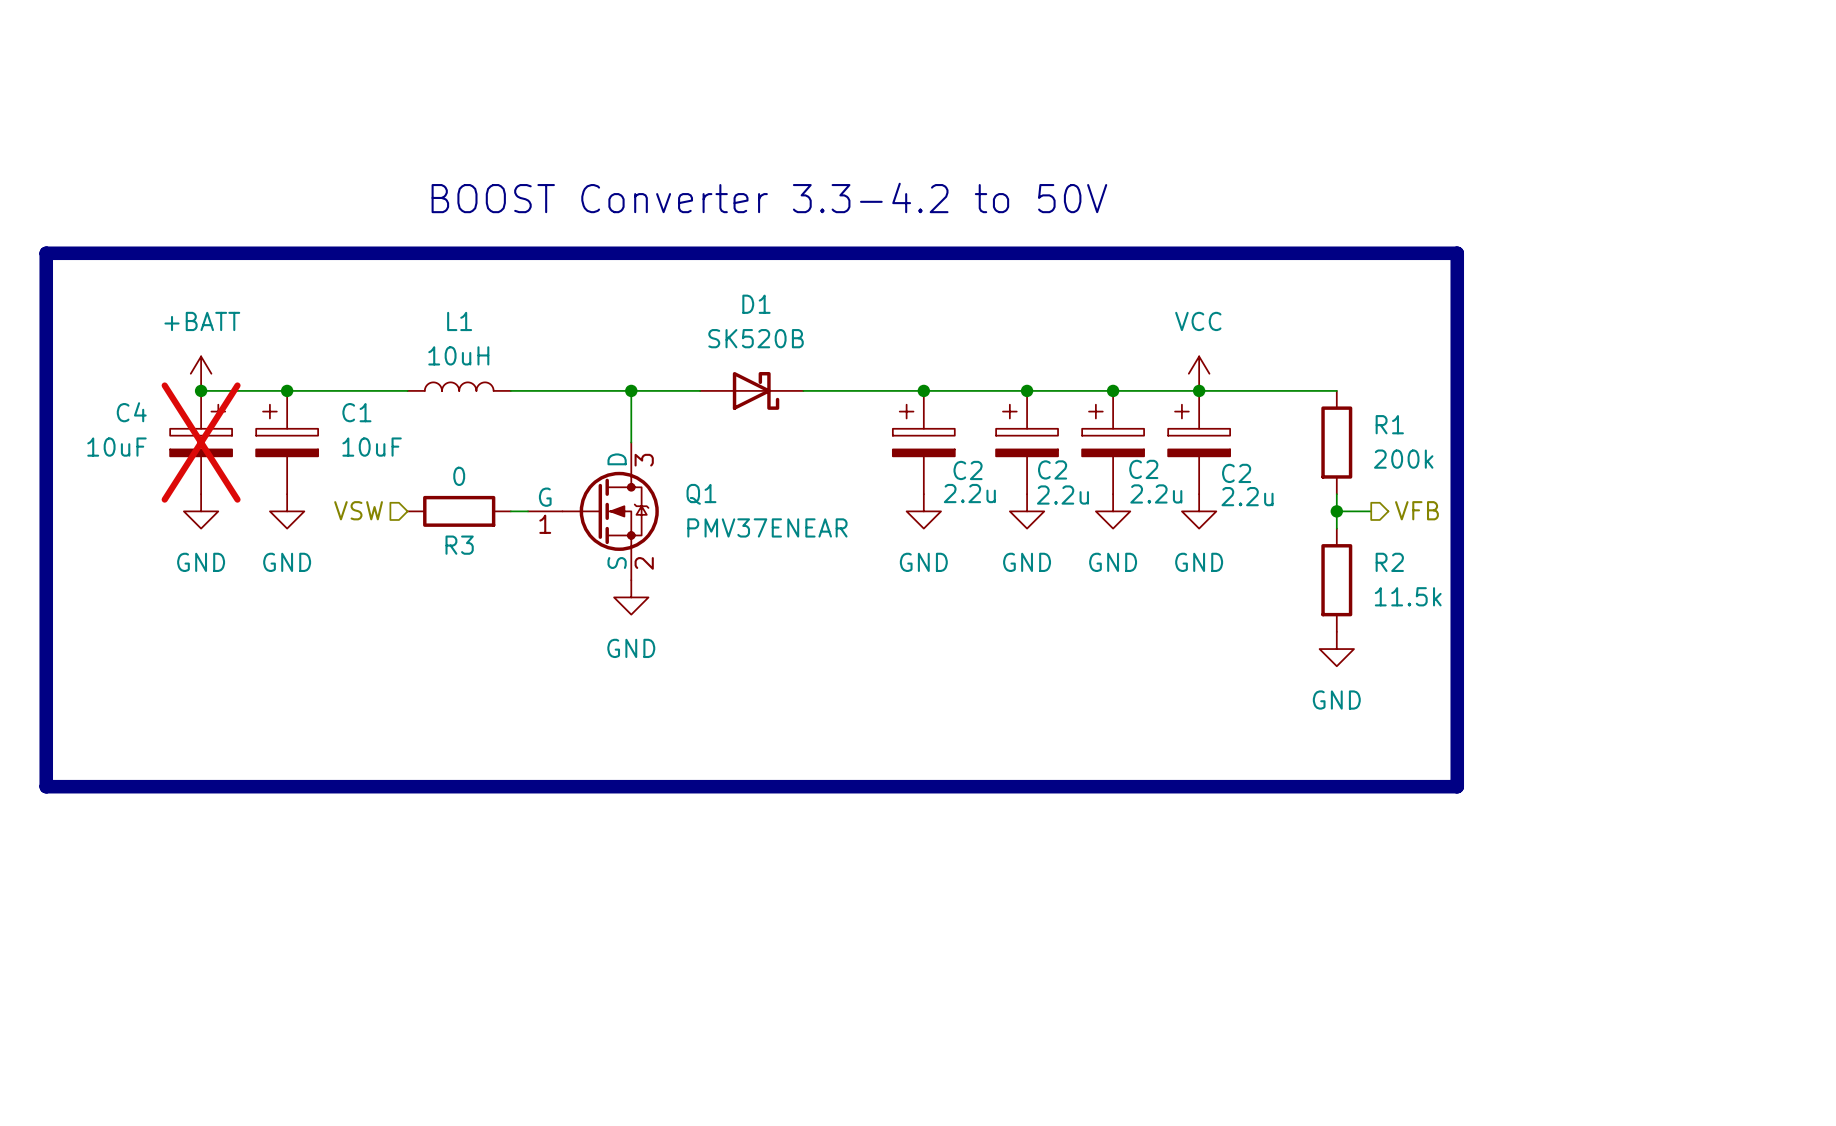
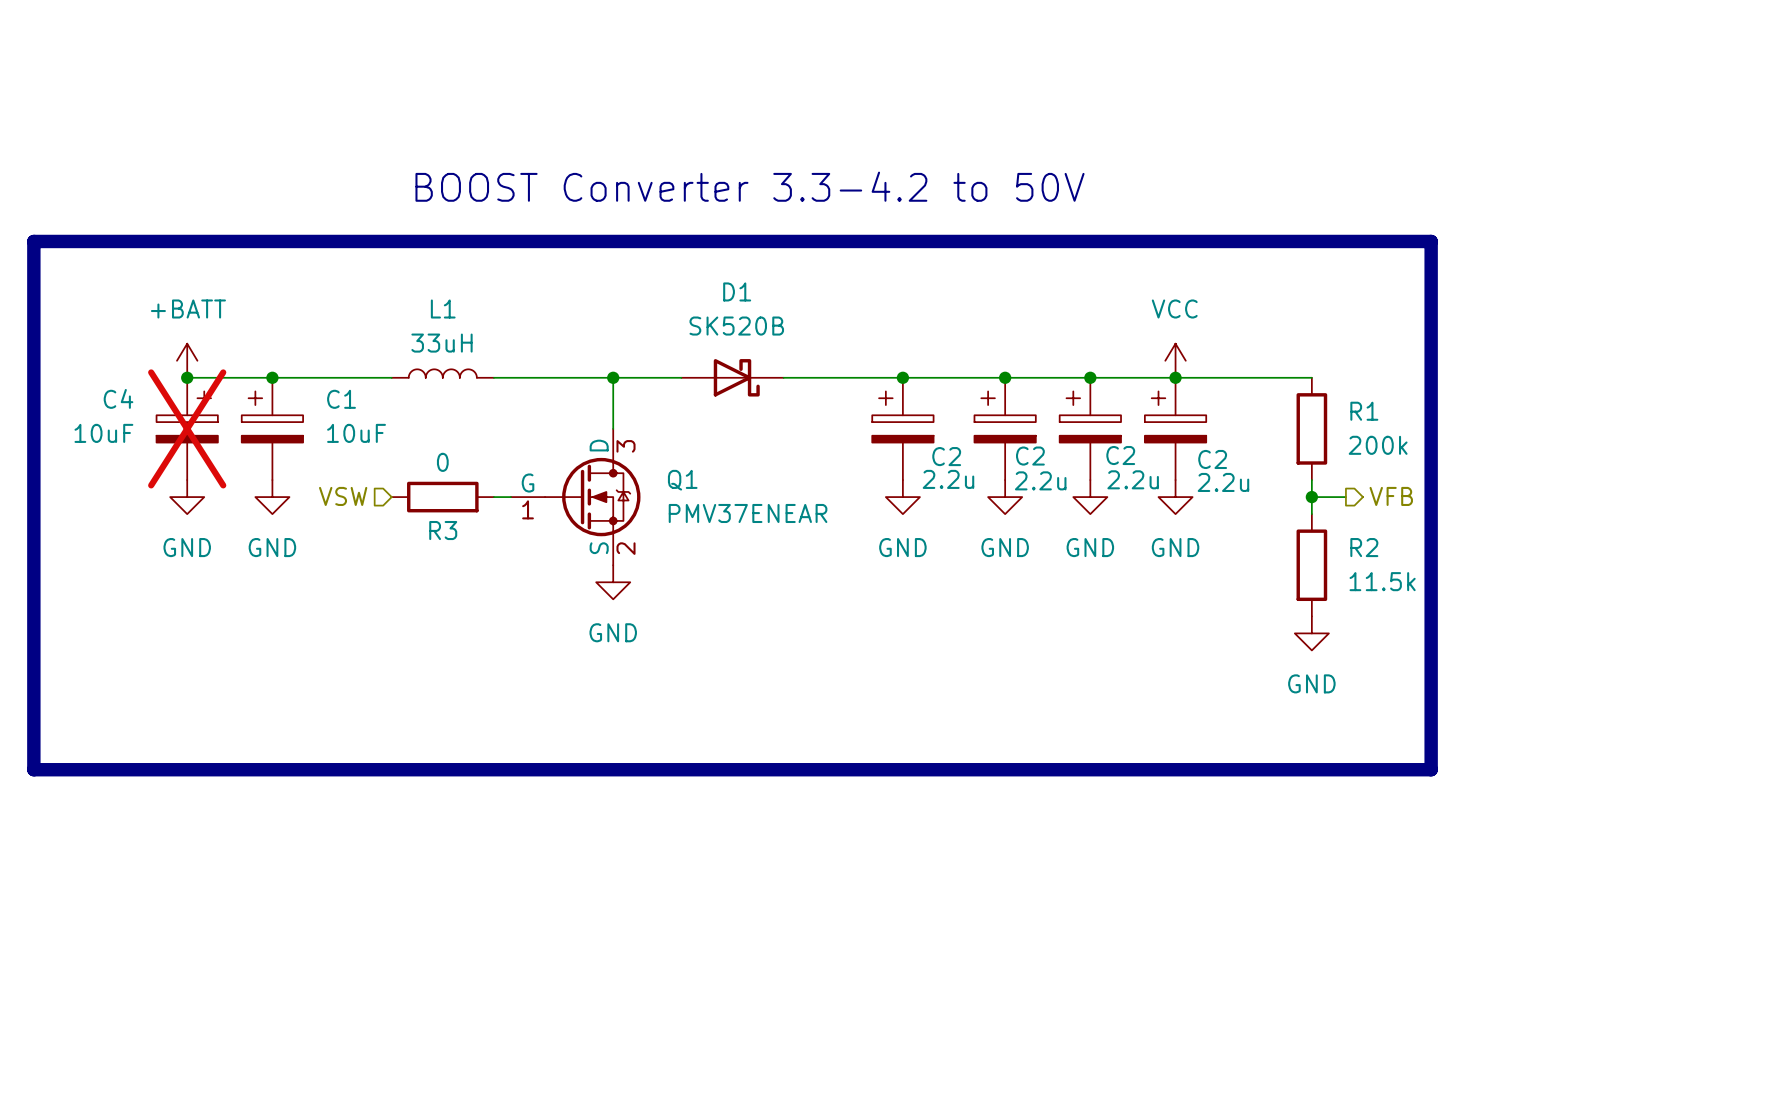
L1 value: 10uH (458, 355) -> 33uH (442, 343)

